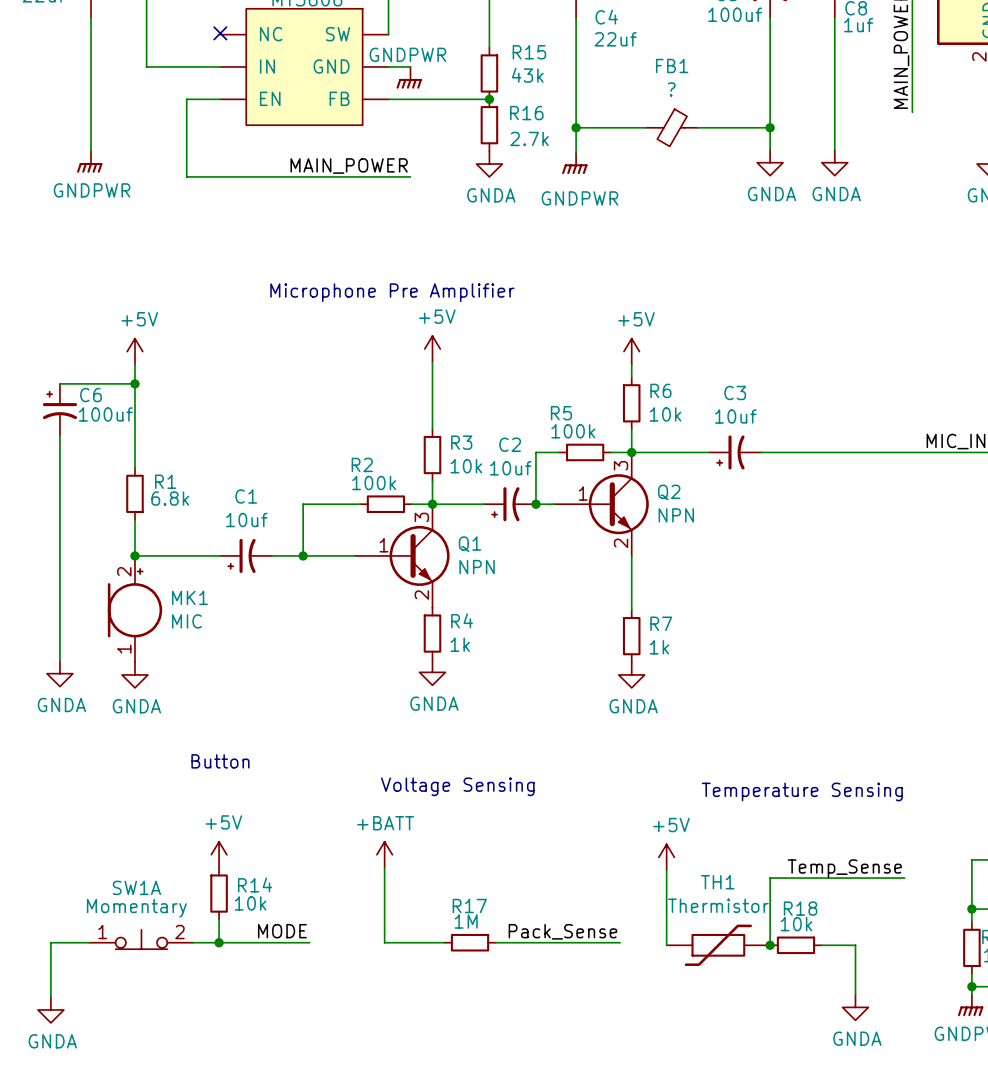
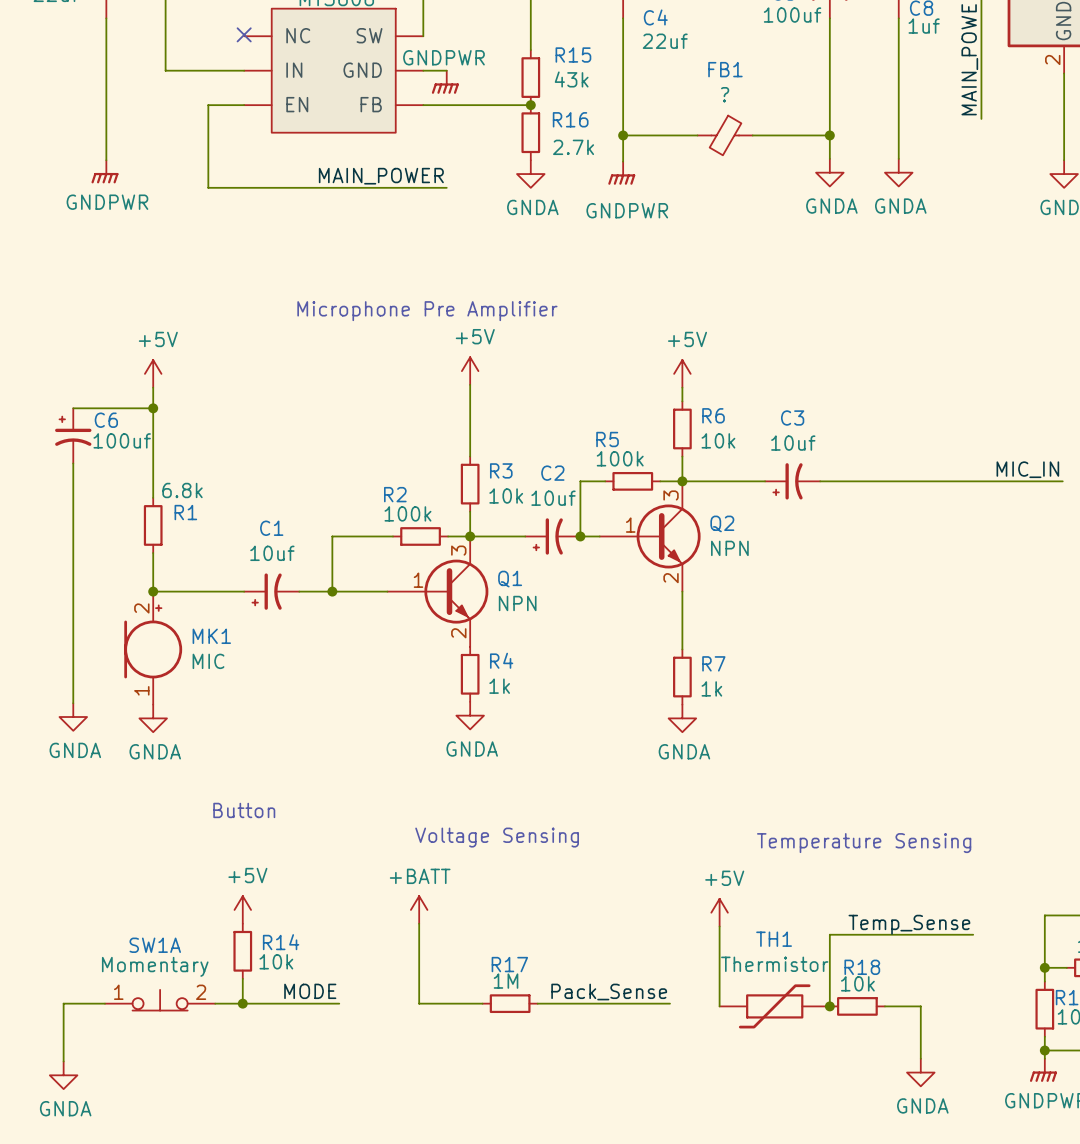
R1 value position: 6.8k (170, 498) -> 6.8k (182, 490)

